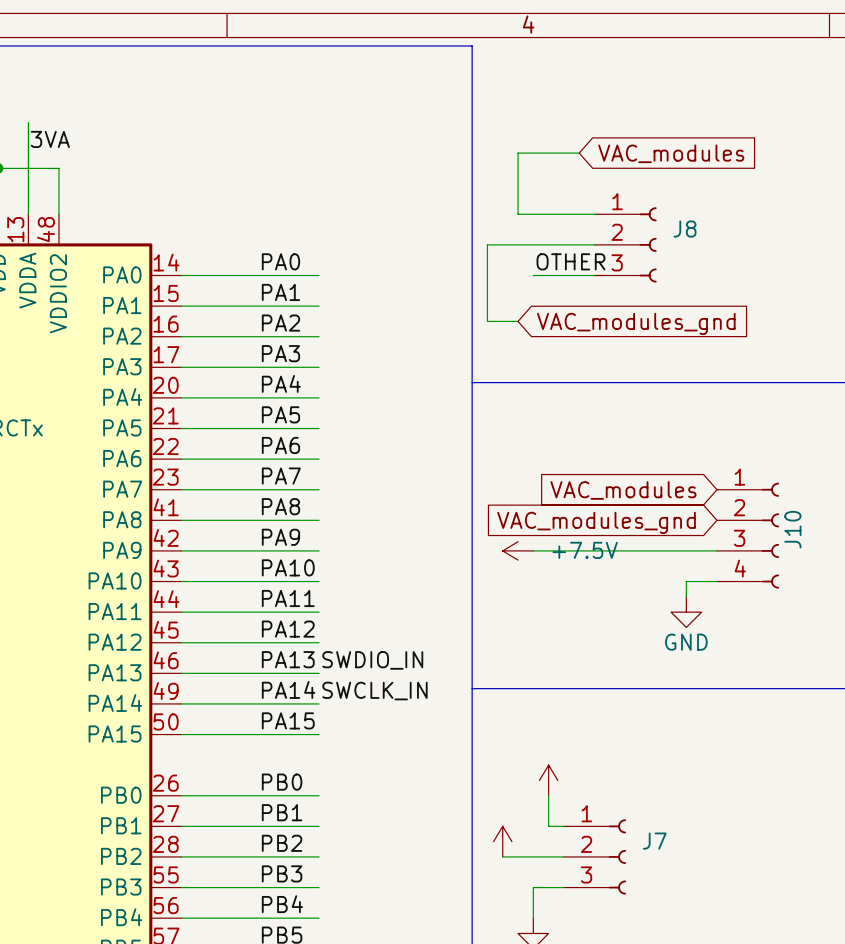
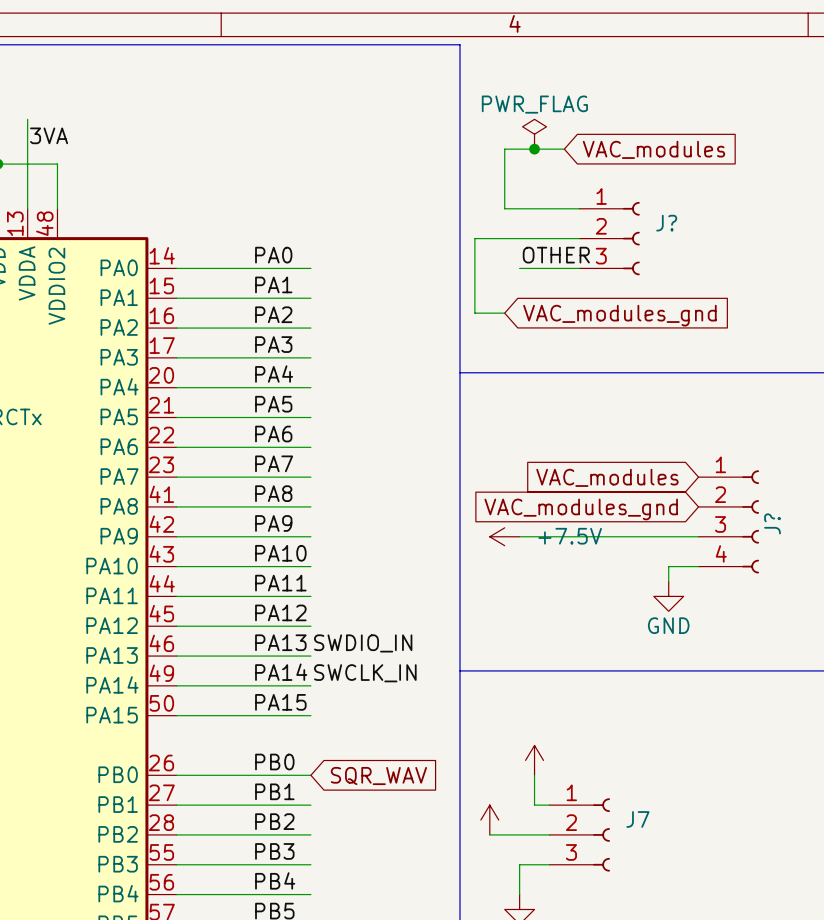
power symbol: none -> PWR_FLAG (534, 134)
junction: none -> (534, 149)
J8 name: J8 (685, 229) -> J? (666, 223)
J10 name: J10 (792, 529) -> J? (772, 523)
global label: none -> SQR_WAV (378, 776)

